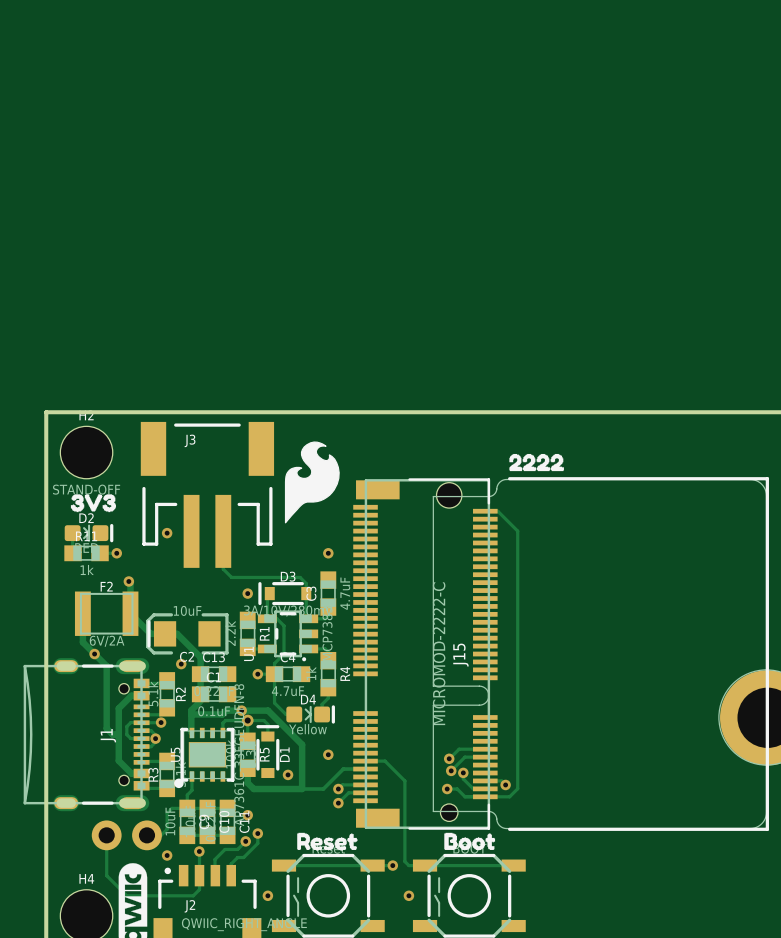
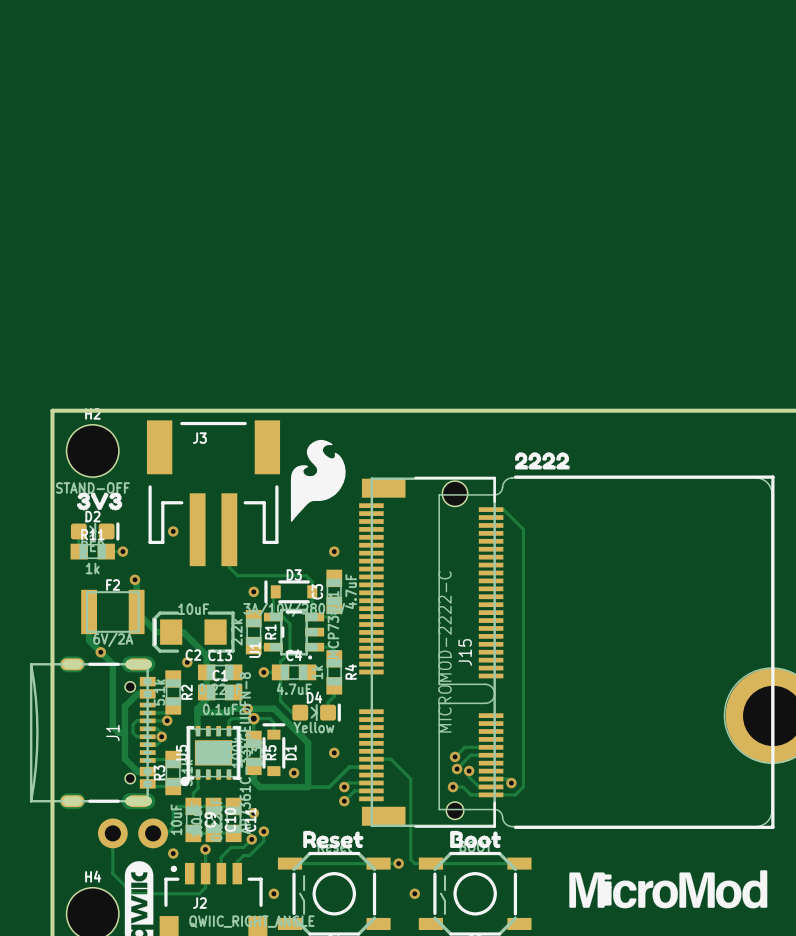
drawing: none -> [569, 870, 768, 909]

